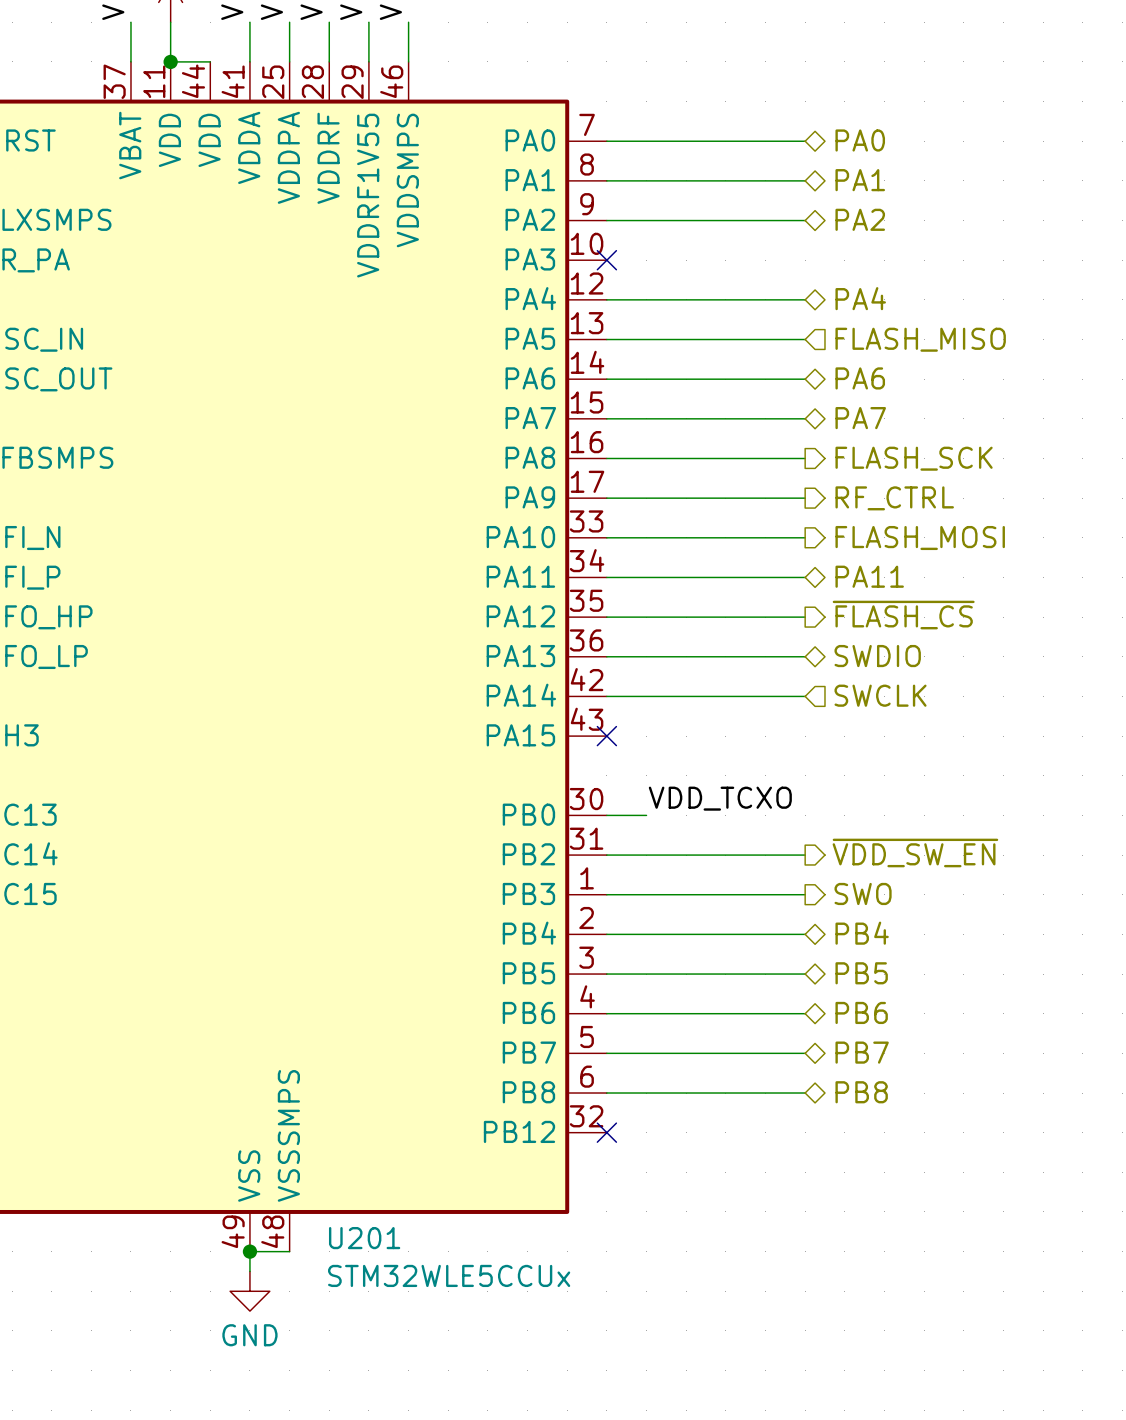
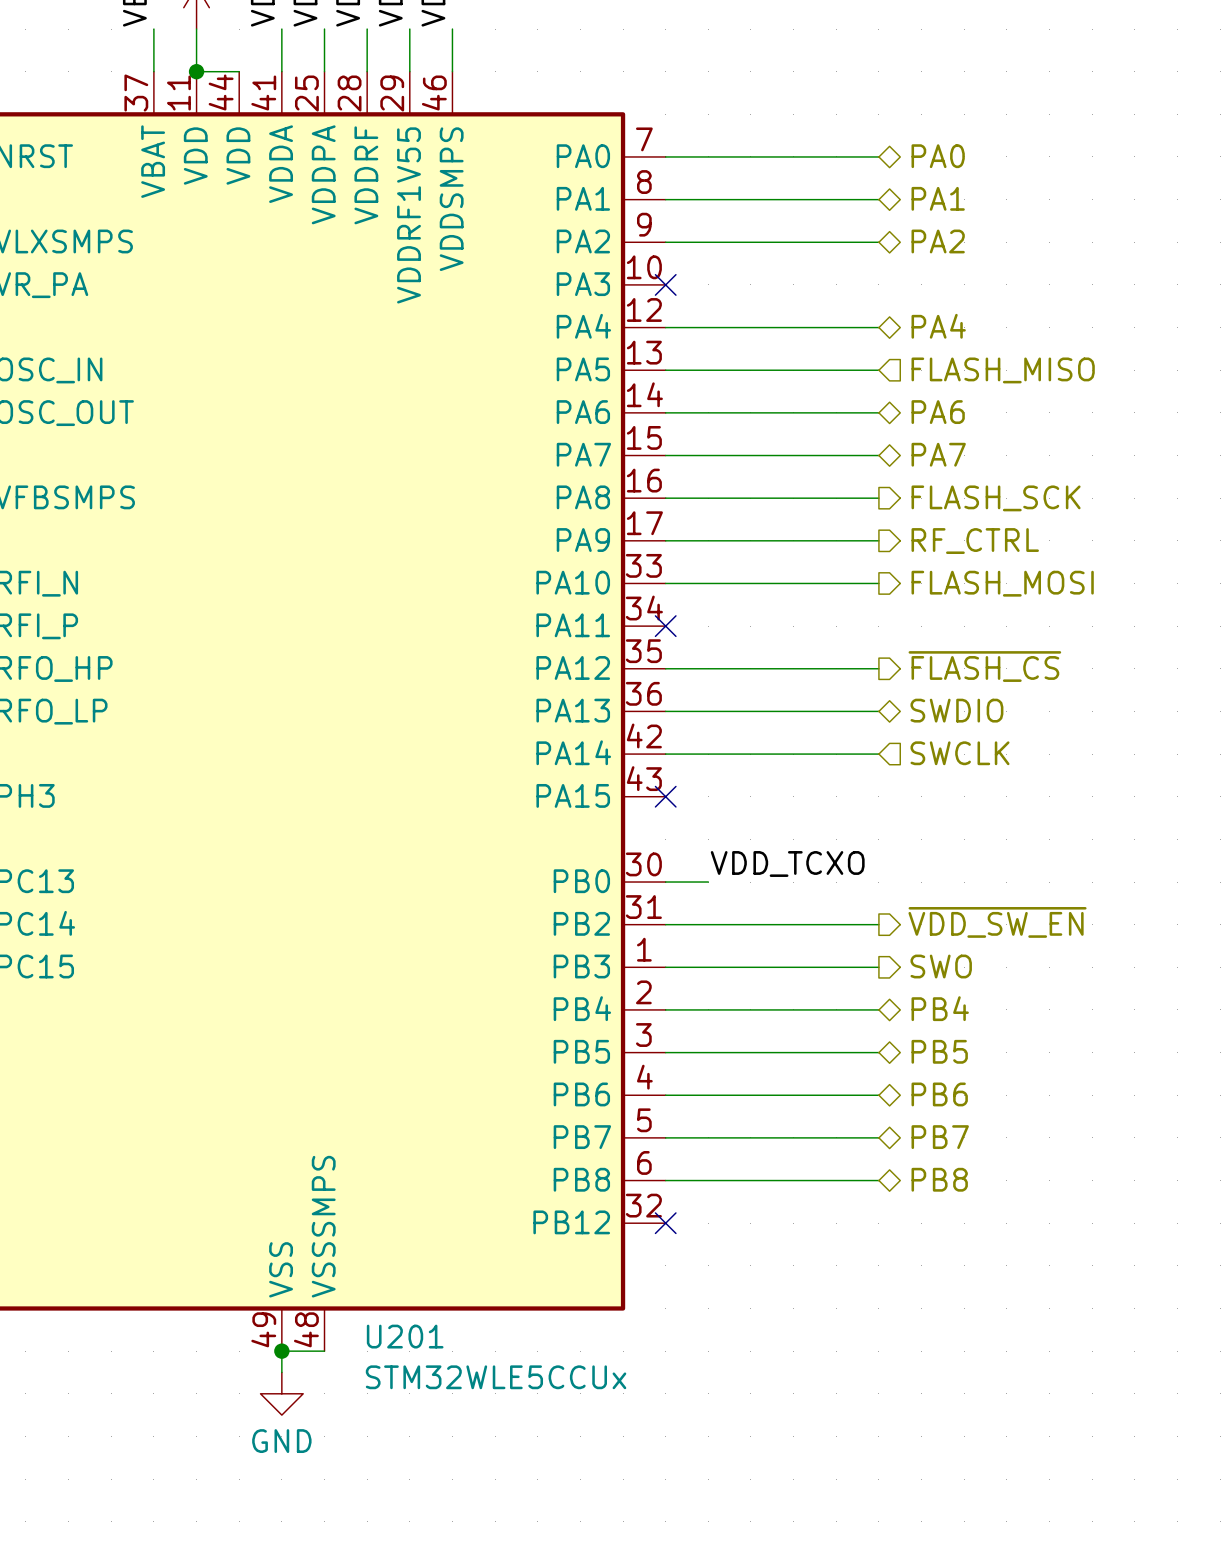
hierarchical label: PA11 (869, 576) -> none
wire: (606, 577) (805, 577) -> none
no-connect mark: none -> (665, 626)

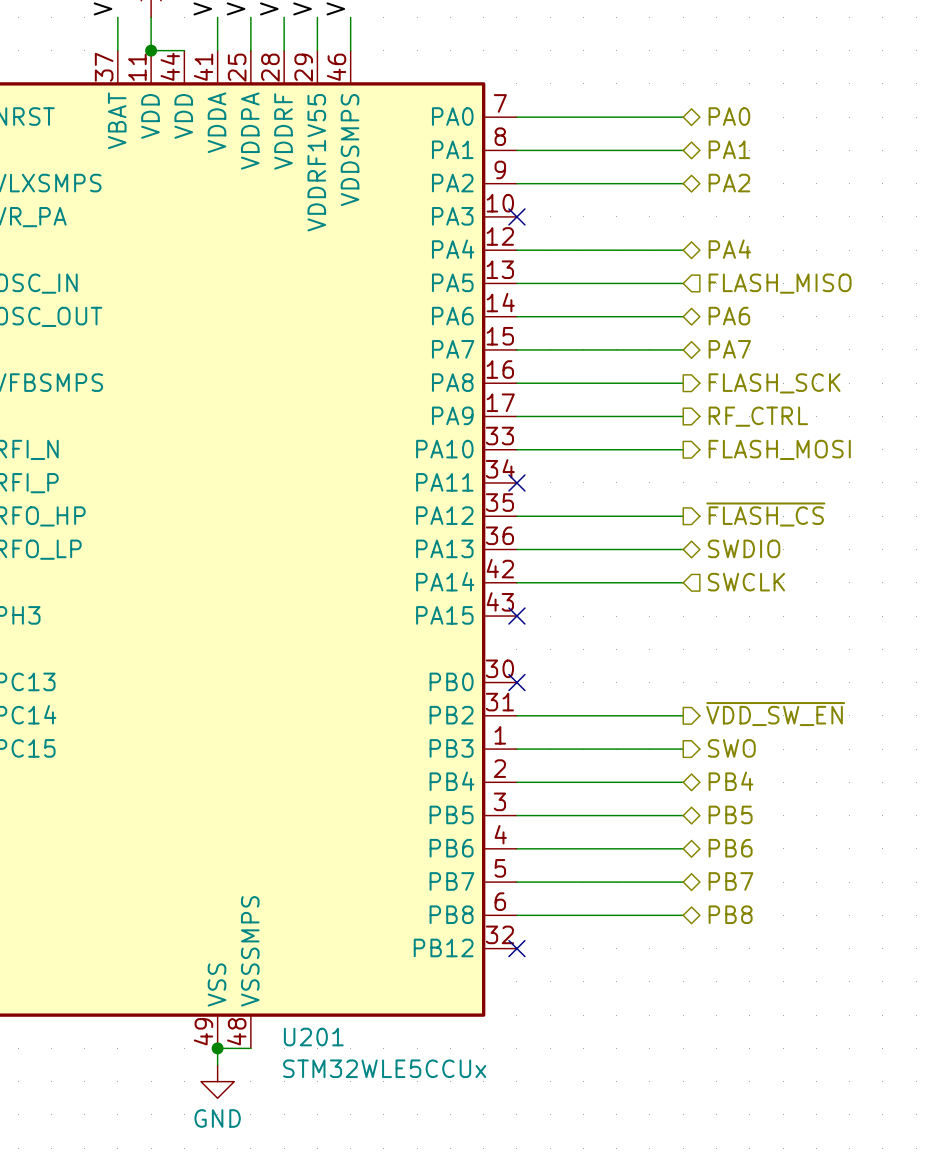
label: VDD_TCXO (787, 863) -> none
wire: (665, 882) (708, 882) -> none
no-connect mark: none -> (516, 682)

